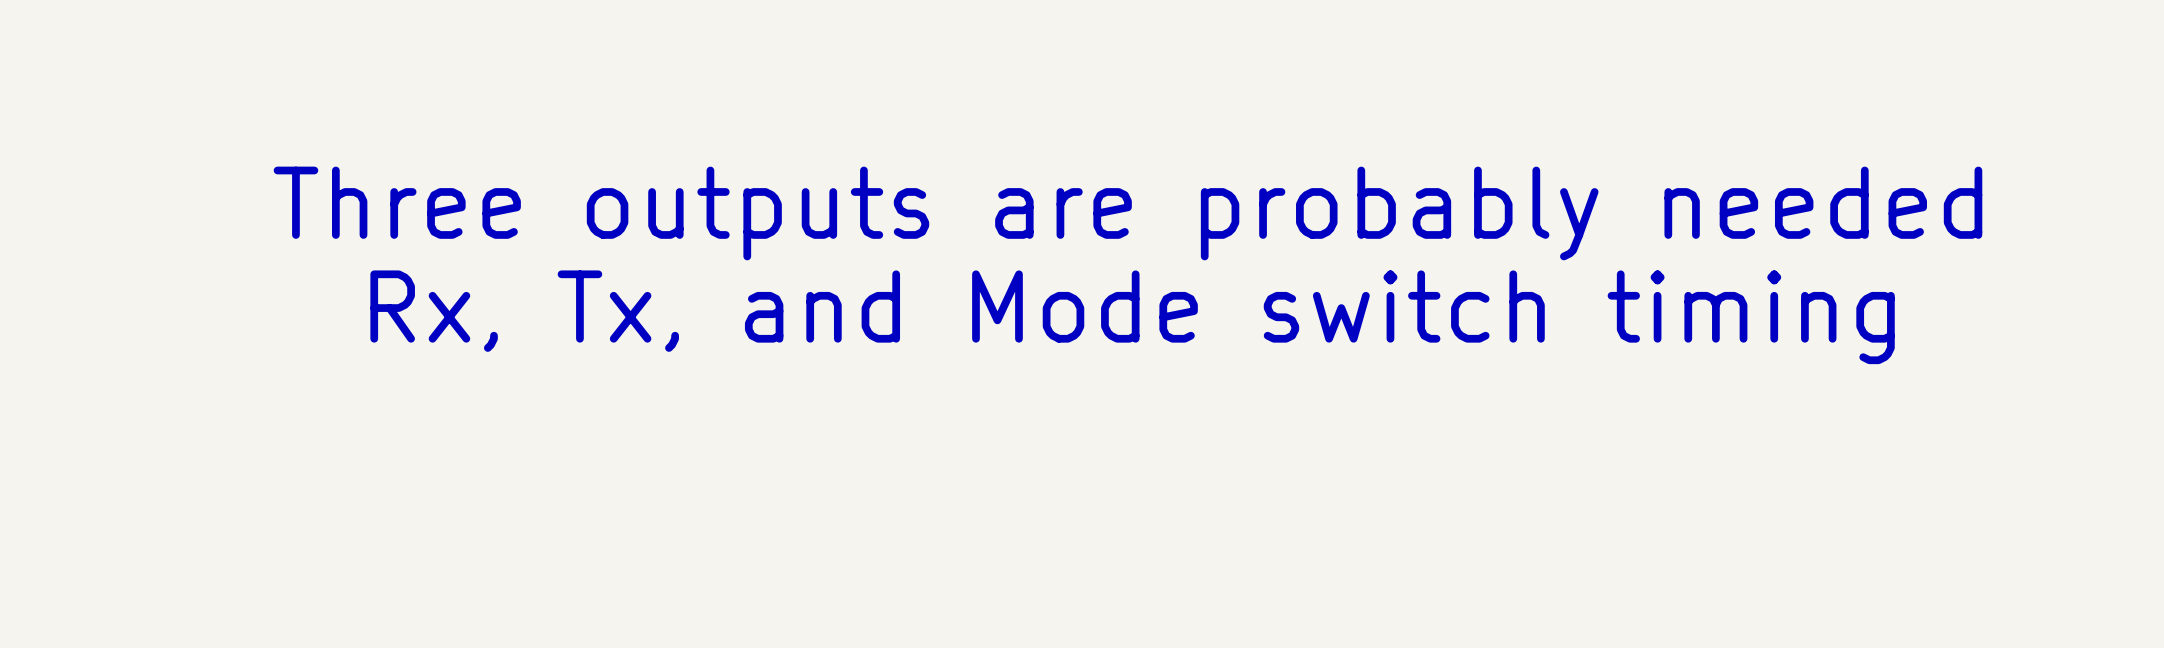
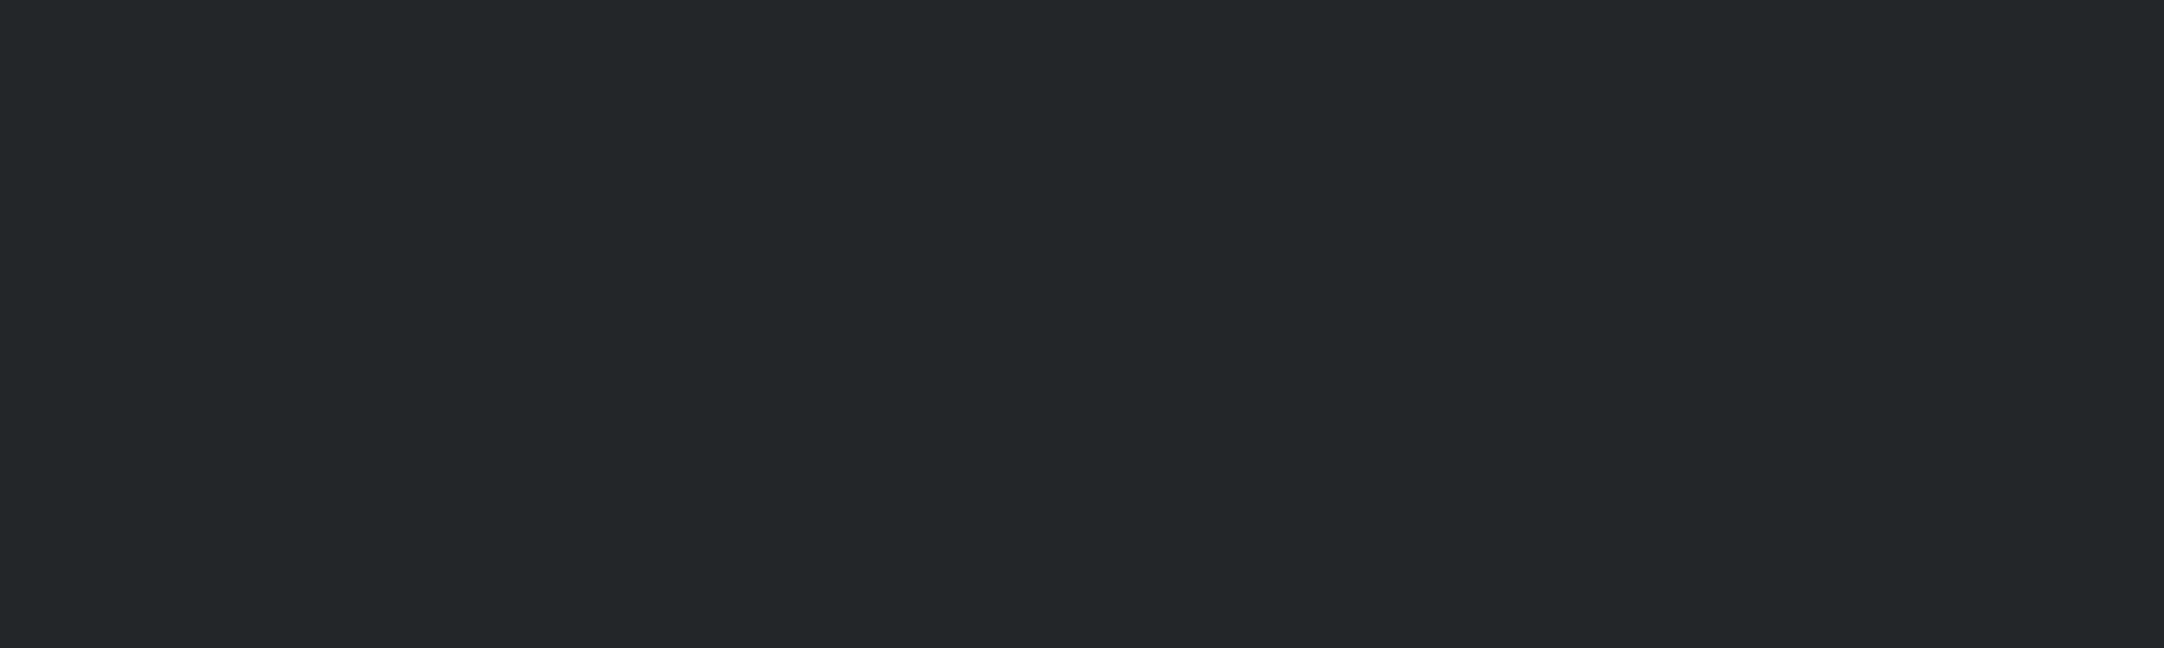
text: Three outputs are probably needed (1127, 213) -> none
text: Rx, Tx, and Mode switch timing (1132, 317) -> none

